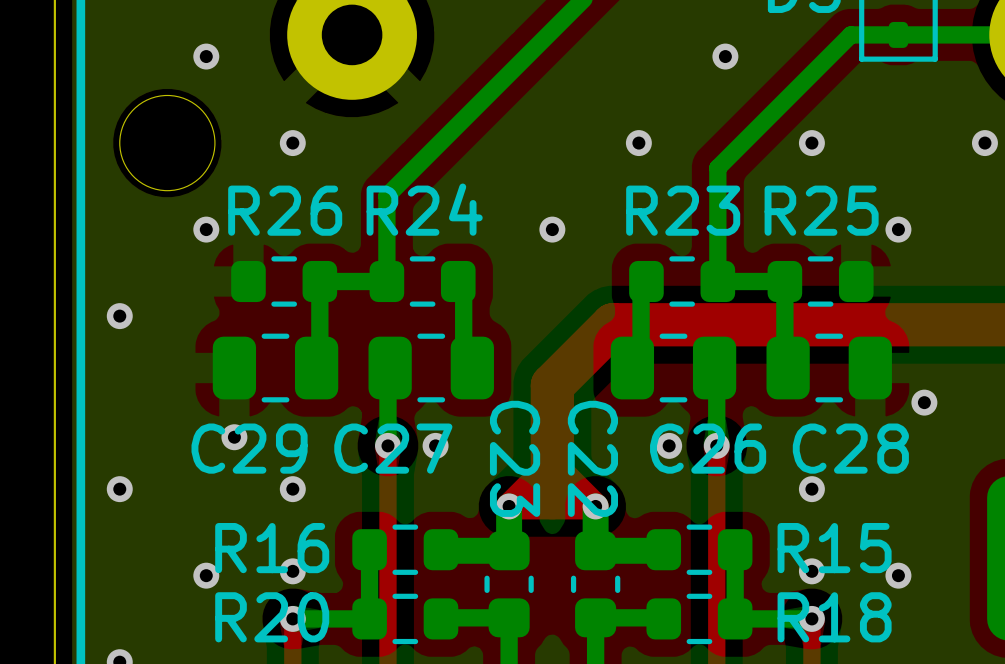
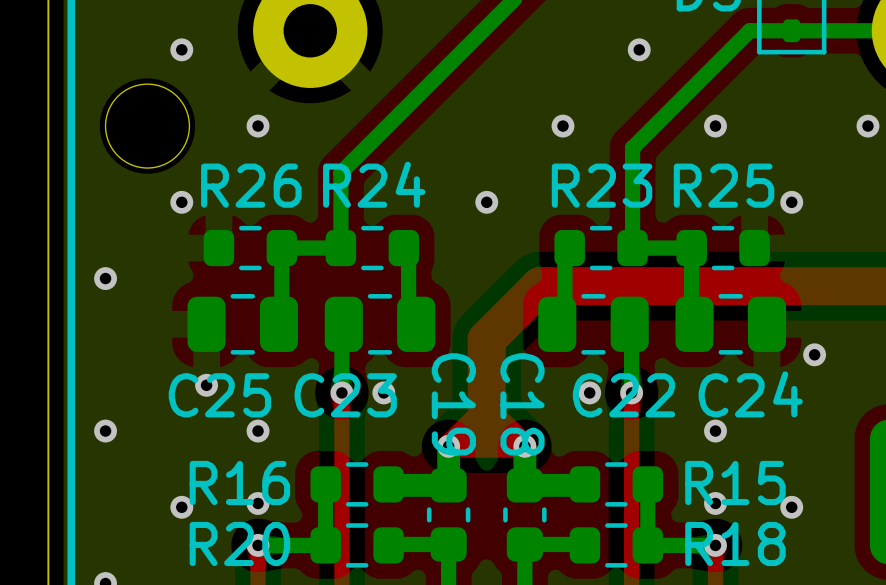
C29 name: C29 (249, 448) -> C25 (219, 395)
C27 name: C27 (393, 448) -> C23 (345, 395)
C26 name: C26 (708, 448) -> C22 (624, 395)
C28 name: C28 (850, 448) -> C24 (750, 394)
C23 name: C23 (515, 458) -> C19 (453, 404)
C22 name: C22 (592, 458) -> C18 (522, 404)

